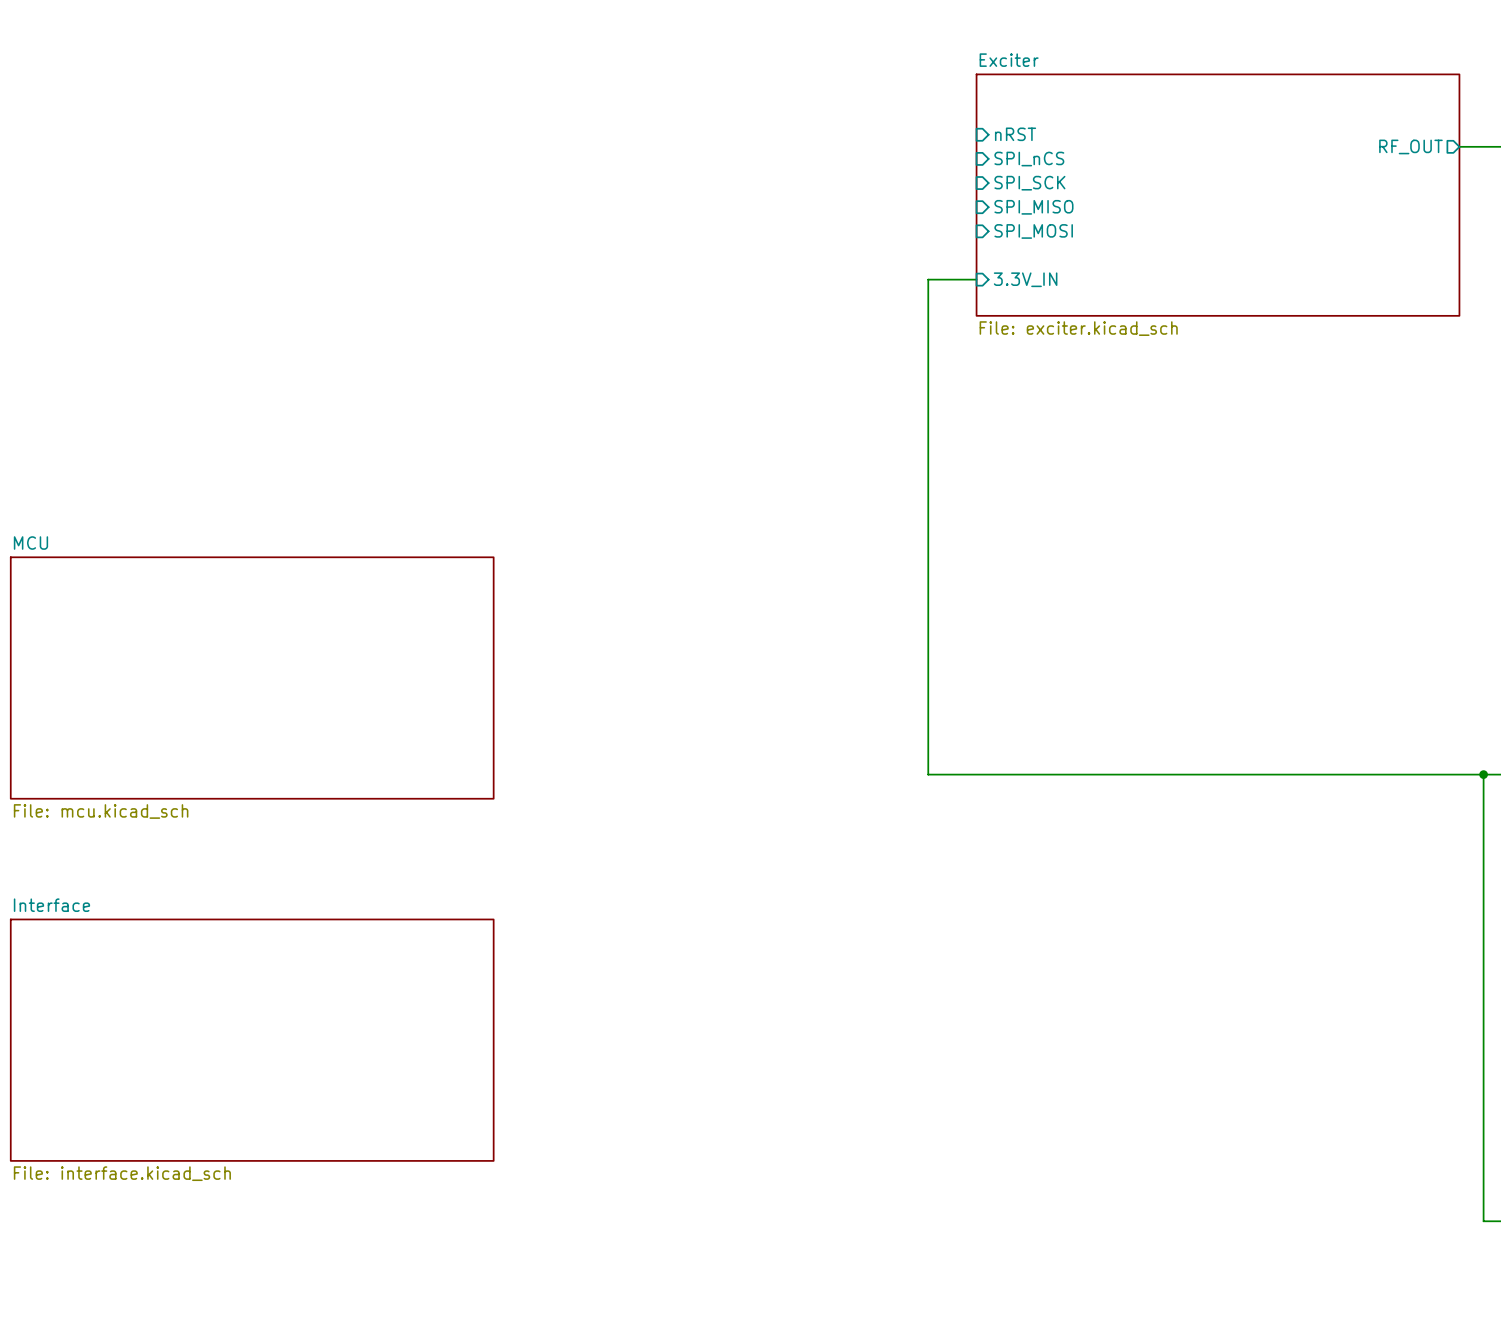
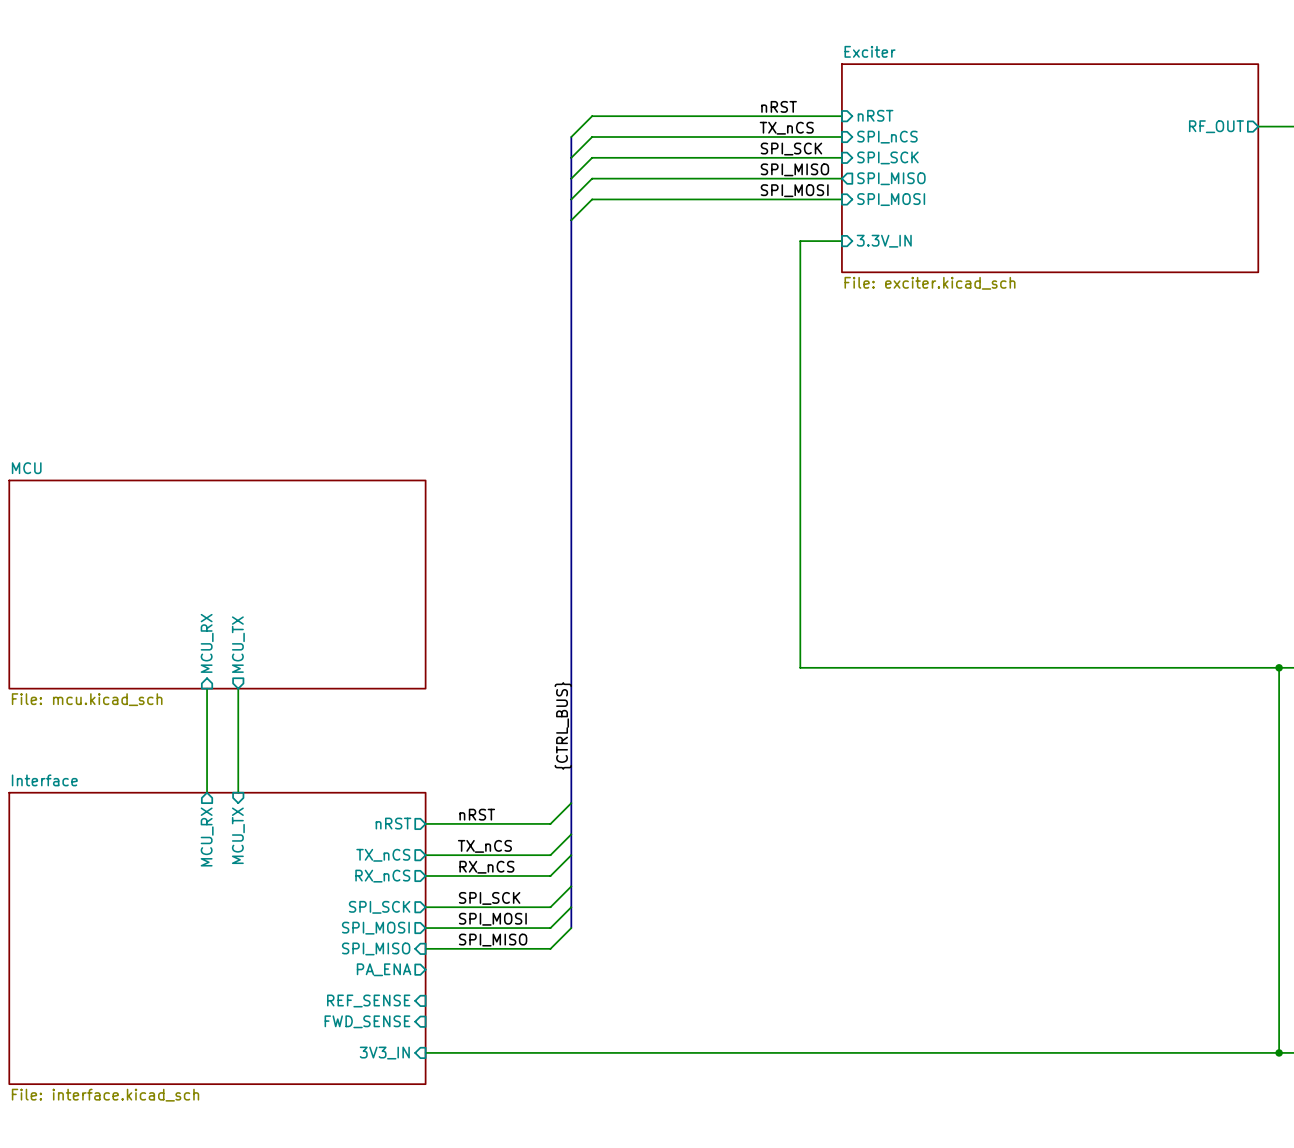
label: none -> nRST (779, 106)
wire: none -> (841, 116) (592, 116) (571, 137)
label: none -> TX_nCS (786, 128)
bus: none -> (571, 137) (571, 928)
wire: none -> (841, 137) (592, 137) (571, 157)
label: none -> SPI_SCK (791, 149)
wire: none -> (841, 157) (592, 157) (571, 178)
label: none -> SPI_MISO (794, 169)
wire: none -> (841, 178) (592, 178) (571, 199)
sheet pin shape: input (1033, 207) -> output (891, 178)
label: none -> SPI_MOSI (794, 190)
wire: none -> (841, 199) (592, 199) (571, 220)
sheet pin: none -> MCU_RX (207, 643)
sheet pin: none -> MCU_TX (238, 644)
wire: none -> (207, 688) (207, 792)
wire: none -> (238, 688) (238, 792)
label: none -> {CTRL_BUS} (563, 725)
wire: none -> (571, 803) (550, 823) (425, 823)
label: none -> nRST (477, 814)
sheet pin: none -> nRST (393, 823)
wire: none -> (571, 834) (550, 855) (425, 855)
sheet pin: none -> MCU_TX (238, 835)
sheet pin: none -> MCU_RX (207, 837)
label: none -> TX_nCS (484, 846)
wire: none -> (571, 855) (550, 875) (425, 875)
sheet pin: none -> TX_nCS (383, 855)
label: none -> RX_nCS (486, 867)
sheet pin: none -> RX_nCS (382, 876)
wire: none -> (571, 886) (550, 907) (425, 907)
sheet Interface: File: interface.kicad_sch (252, 1040) -> none
label: none -> SPI_SCK (489, 898)
sheet pin: none -> SPI_SCK (379, 907)
wire: none -> (571, 907) (550, 928) (425, 928)
label: none -> SPI_MOSI (492, 919)
sheet pin: none -> SPI_MOSI (375, 928)
wire: none -> (571, 928) (550, 948) (425, 948)
sheet Interface: none -> File: interface.kicad_sch (217, 938)
label: none -> SPI_MISO (493, 940)
sheet pin: none -> SPI_MISO (376, 948)
sheet pin: none -> PA_ENA (384, 969)
sheet pin: none -> REF_SENSE (368, 1001)
sheet pin: none -> FWD_SENSE (367, 1021)
sheet pin: none -> 3V3_IN (384, 1053)
wire: none -> (425, 1052) (1279, 1052)
junction: none -> (1279, 1052)

